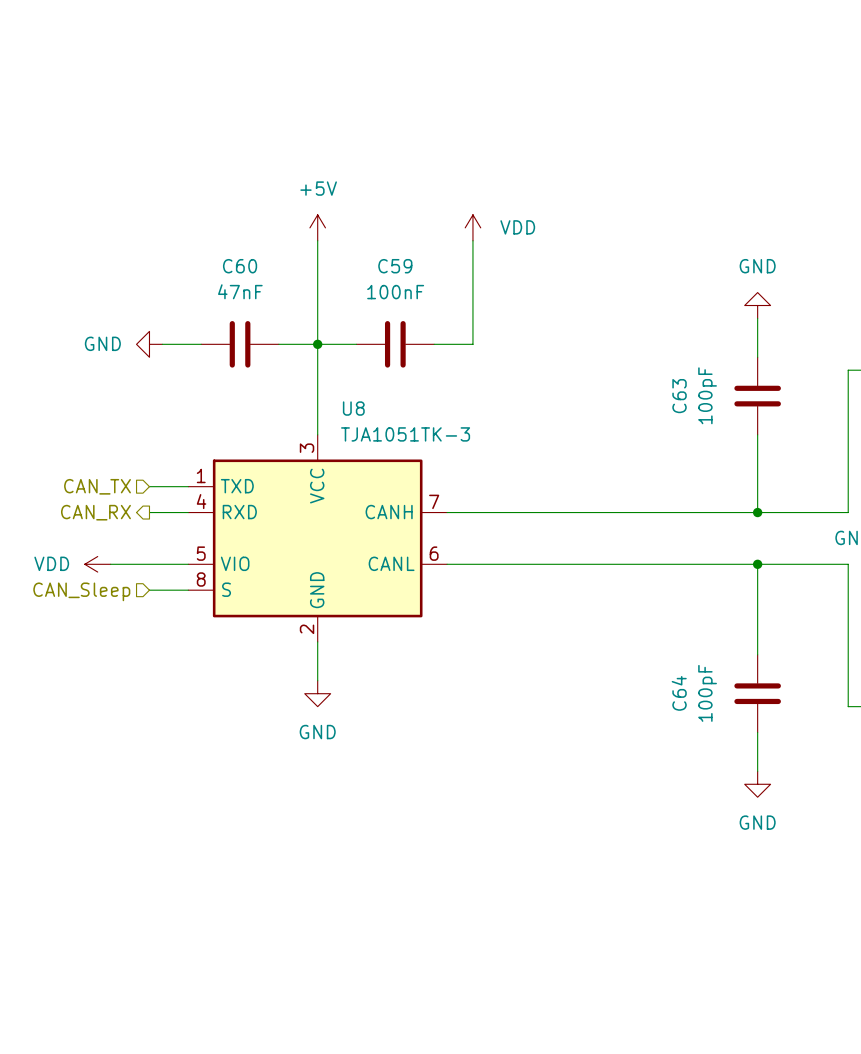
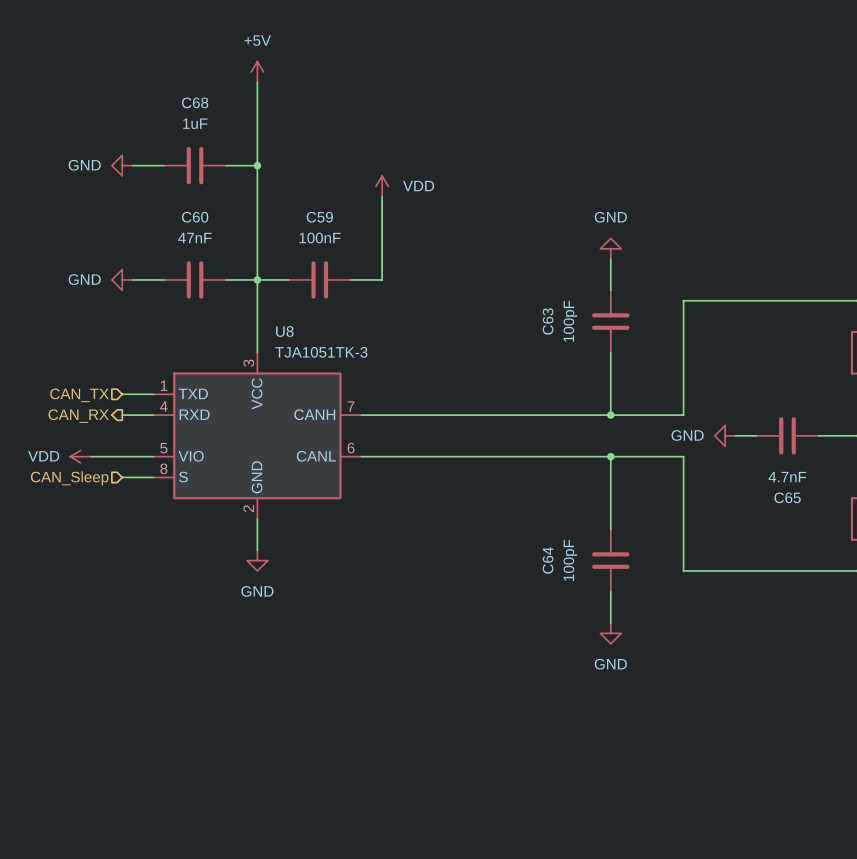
wire: none -> (257, 82) (257, 196)
power symbol: none -> GND (122, 165)
wire: none -> (132, 165) (163, 165)
C68: none -> 1uF (195, 165)
wire: none -> (226, 165) (257, 165)
junction: none -> (257, 165)
power symbol position: +5V (317, 227) -> +5V (257, 72)

